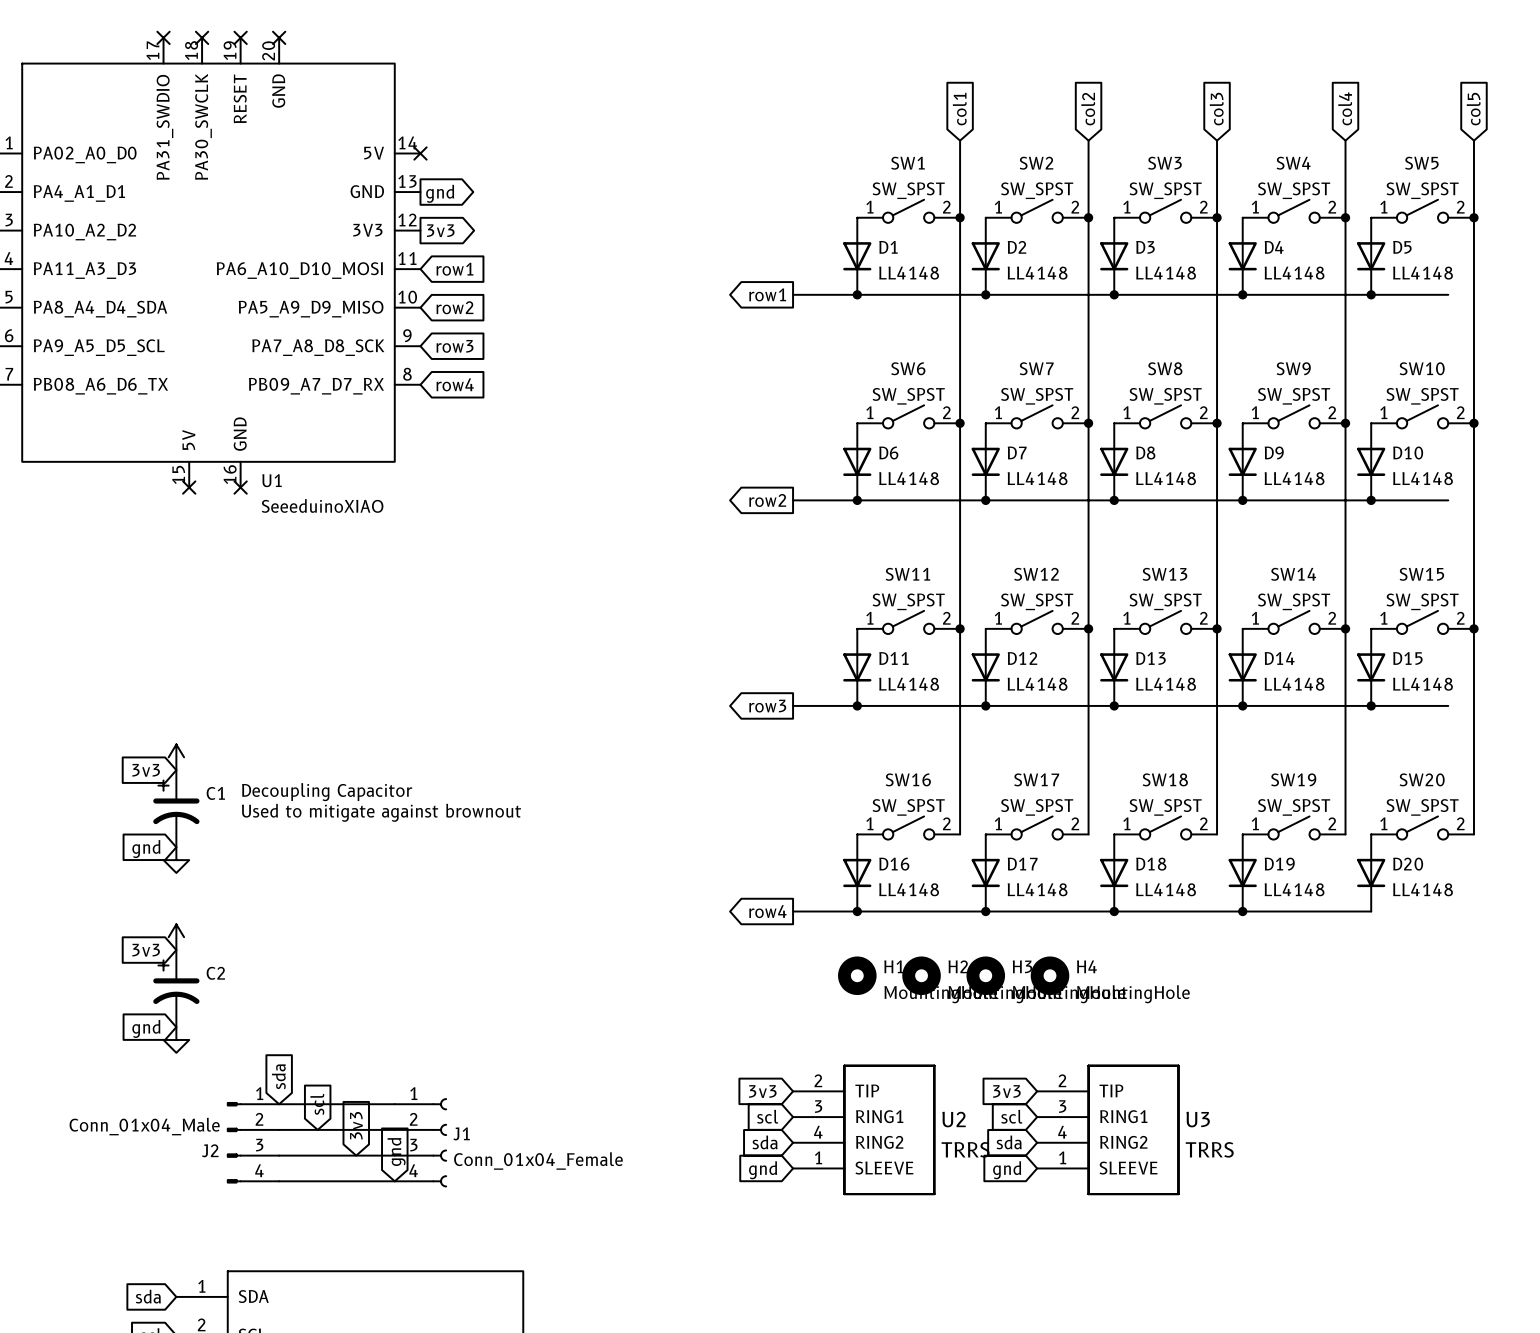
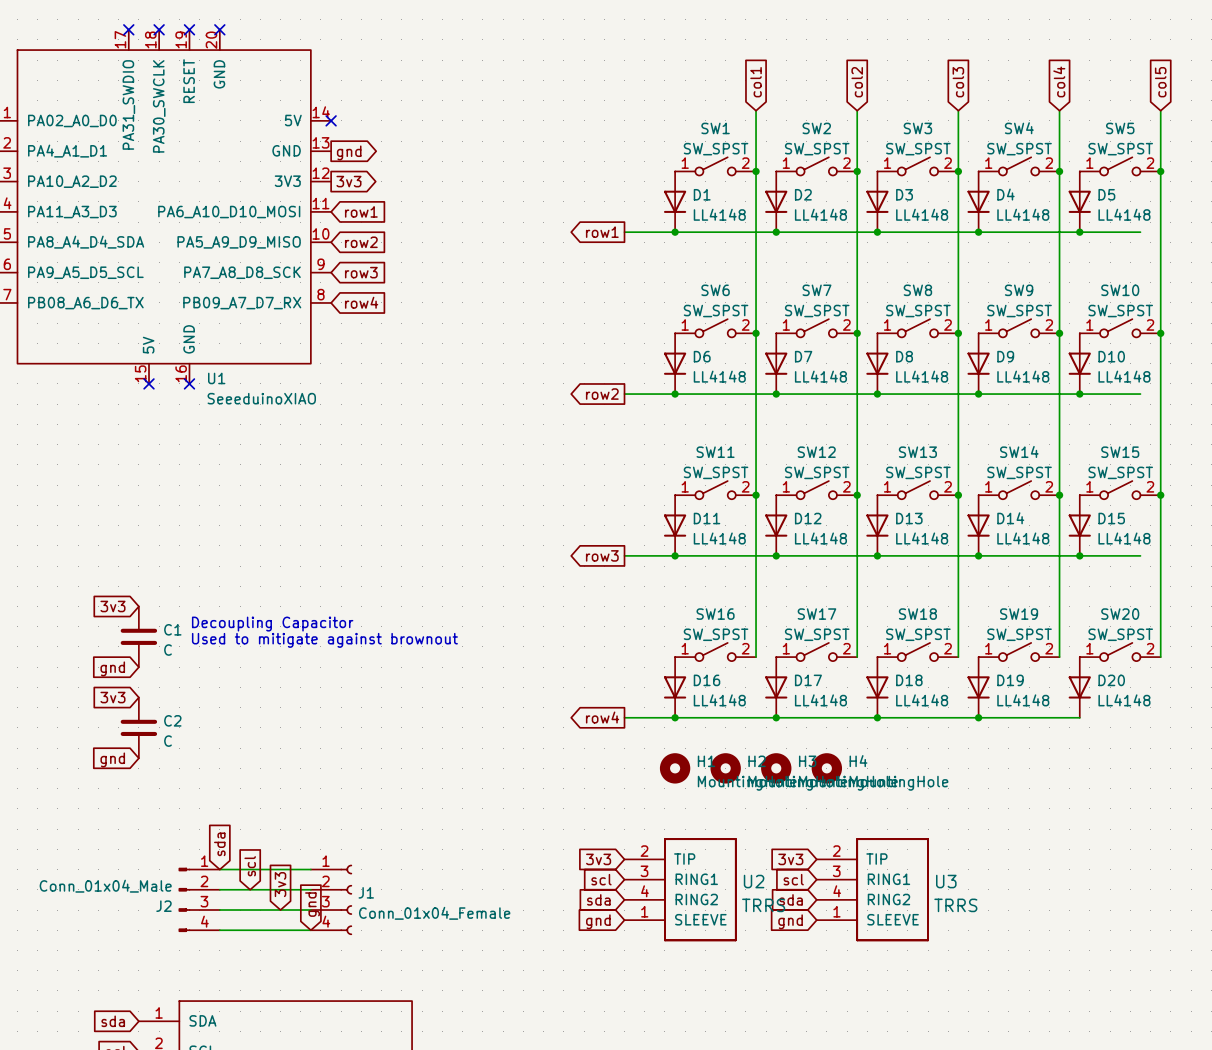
power symbol: (176, 757) -> none
C1 symbol: [153, 770, 200, 848] -> [120, 606, 158, 668]
C1 value: none -> C (168, 650)
power symbol: (176, 860) -> none
power symbol: (176, 937) -> none
C2 value: none -> C (168, 741)
global label position: 3v3 (146, 950) -> 3v3 (112, 697)
C2 symbol: [153, 950, 200, 1028] -> [120, 697, 158, 759]
global label position: gnd (146, 1028) -> gnd (112, 759)
power symbol: (176, 1039) -> none

